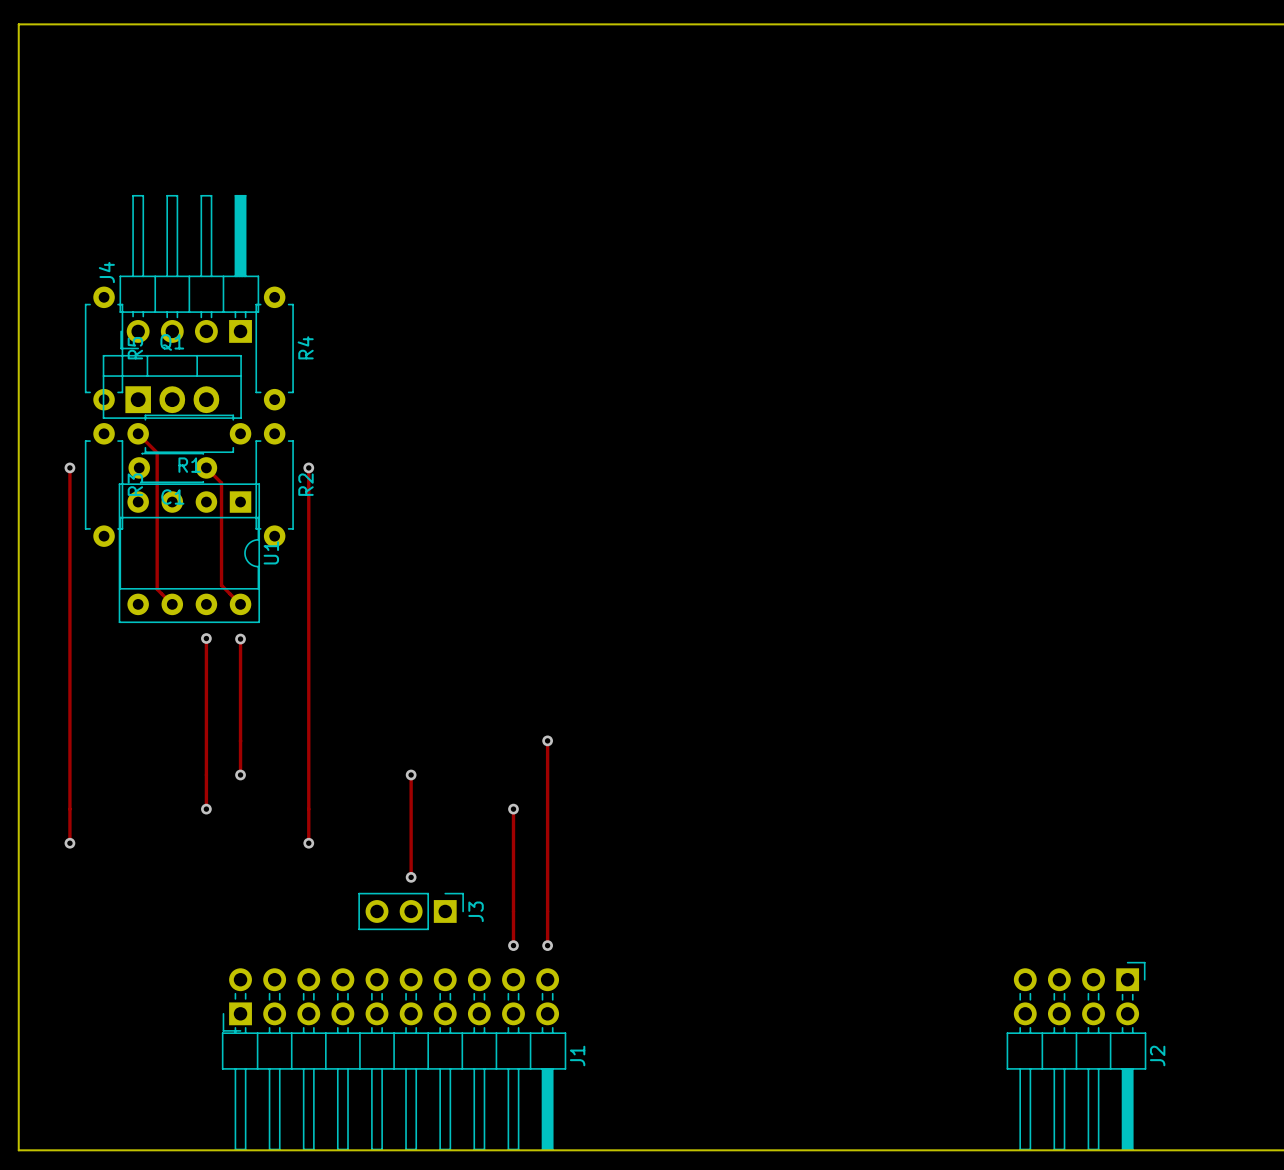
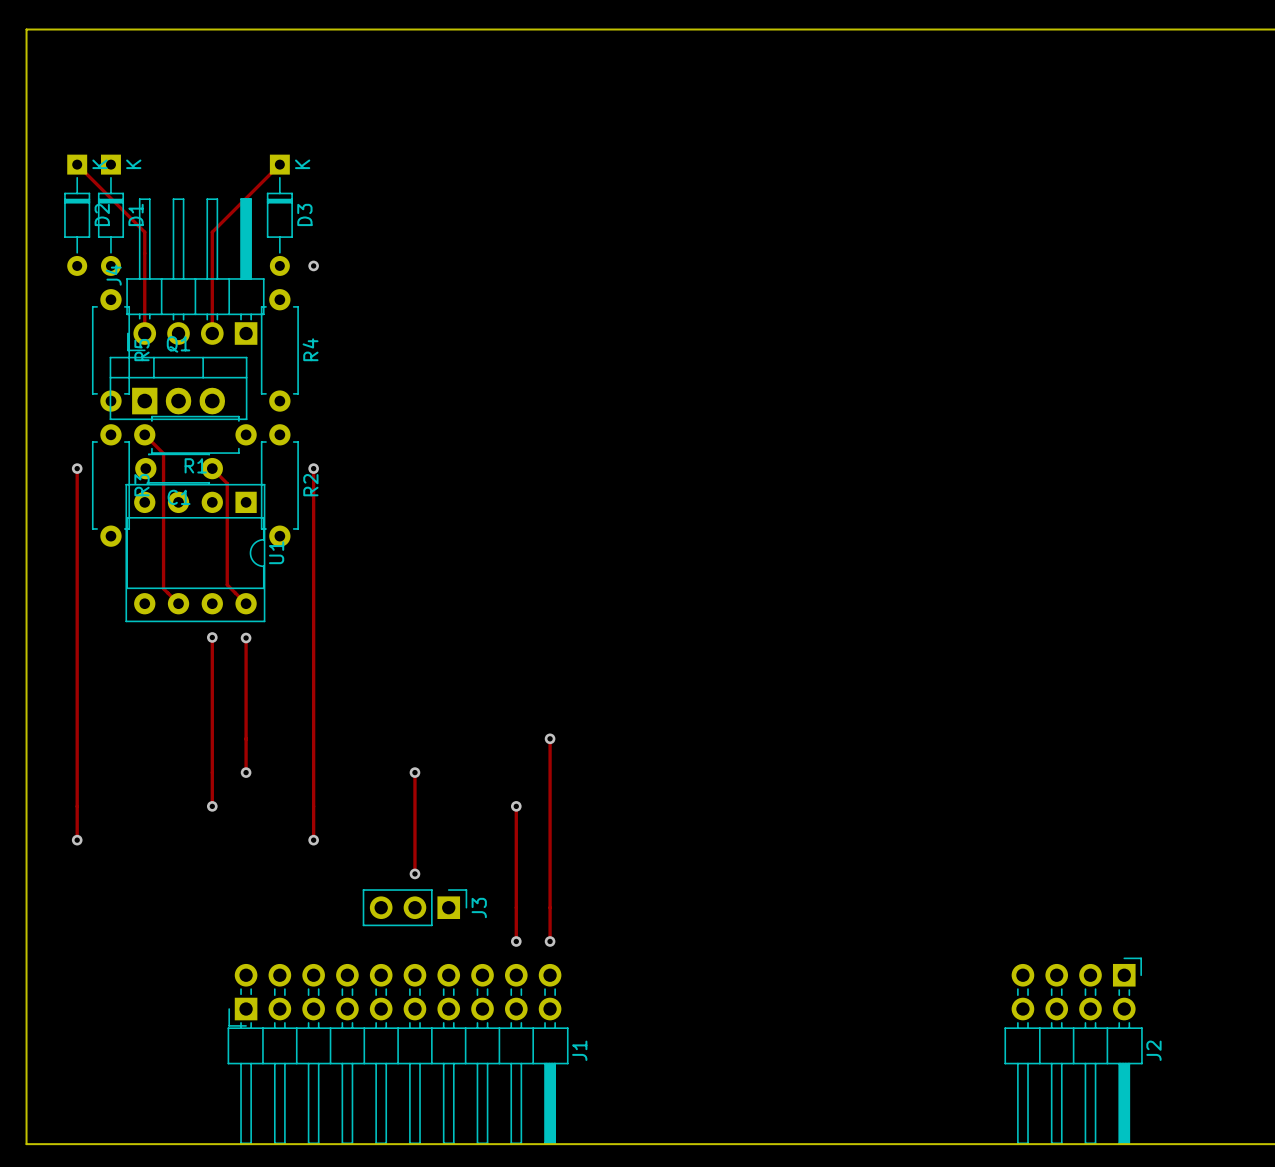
track: none -> (77, 164) (144, 232) (144, 333)
track: none -> (279, 164) (212, 232) (212, 333)
D2: none -> (77, 215)
D1: none -> (110, 215)
D3: none -> (279, 215)
via: none -> (313, 265)

